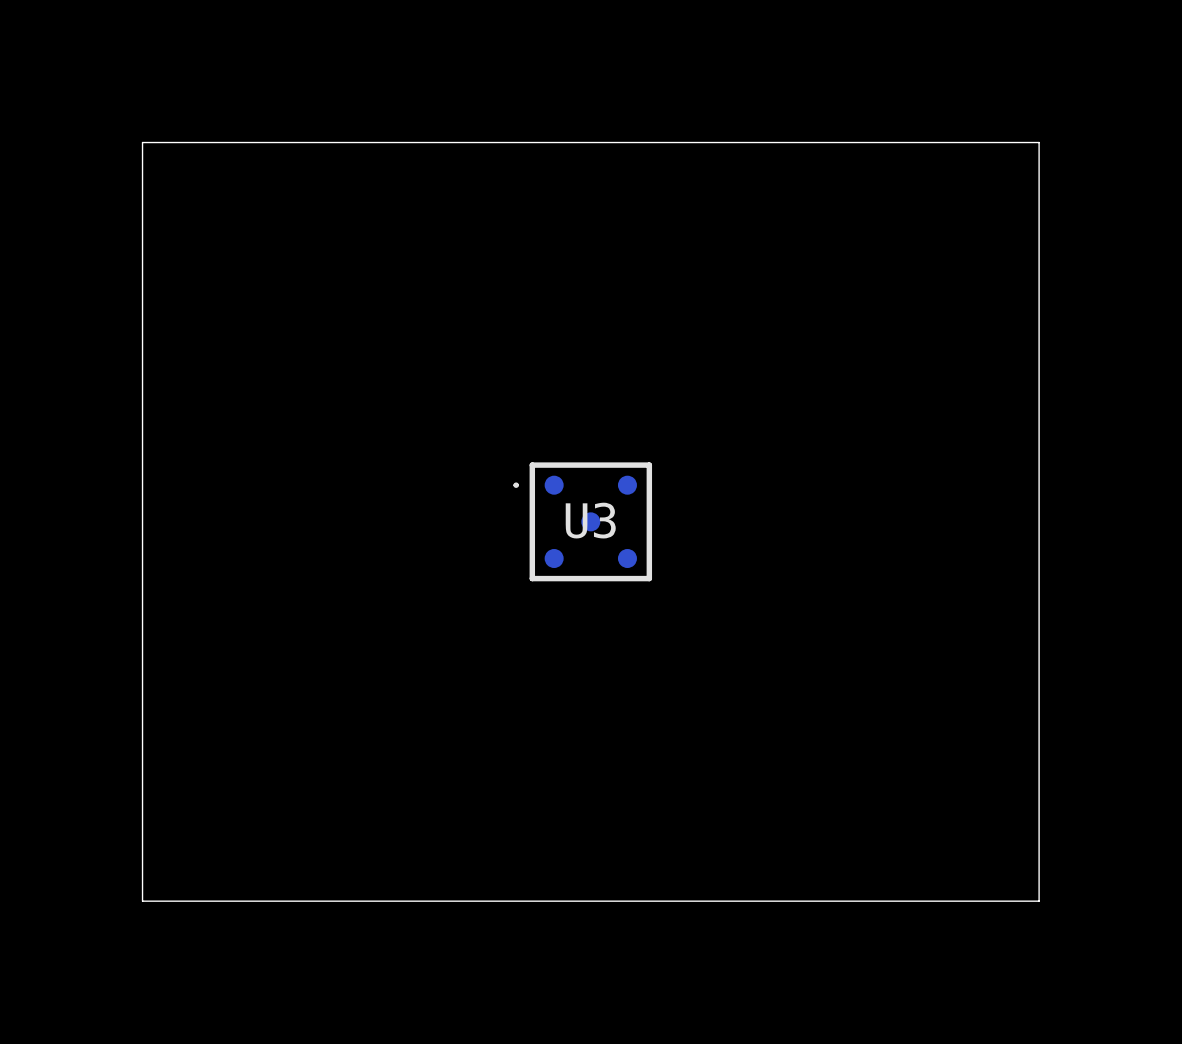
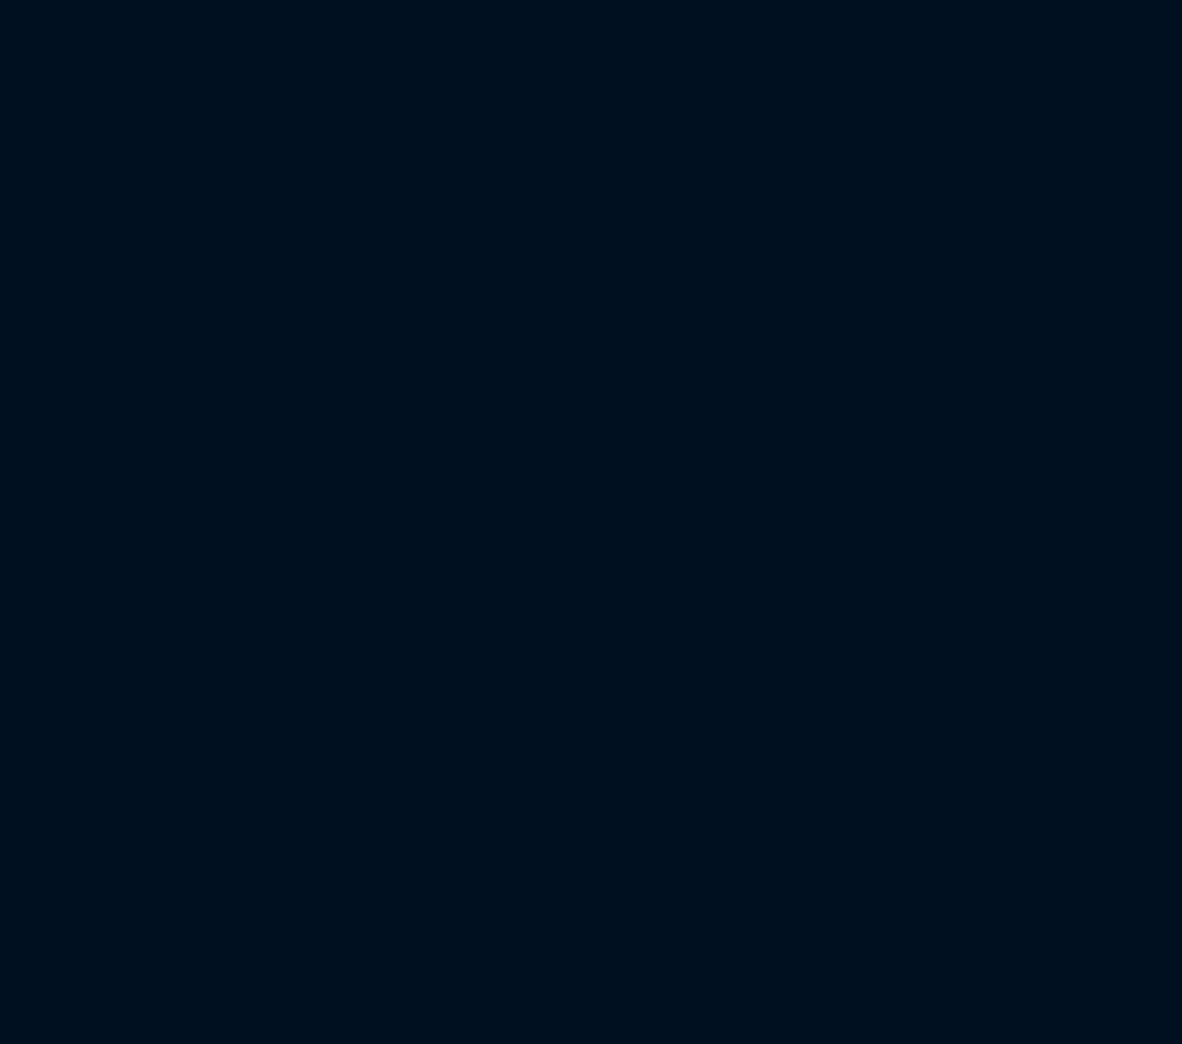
board edge: (1039, 142) (142, 142) (142, 901) (1039, 901) (1039, 142) -> none
U3: (582, 521) -> none

